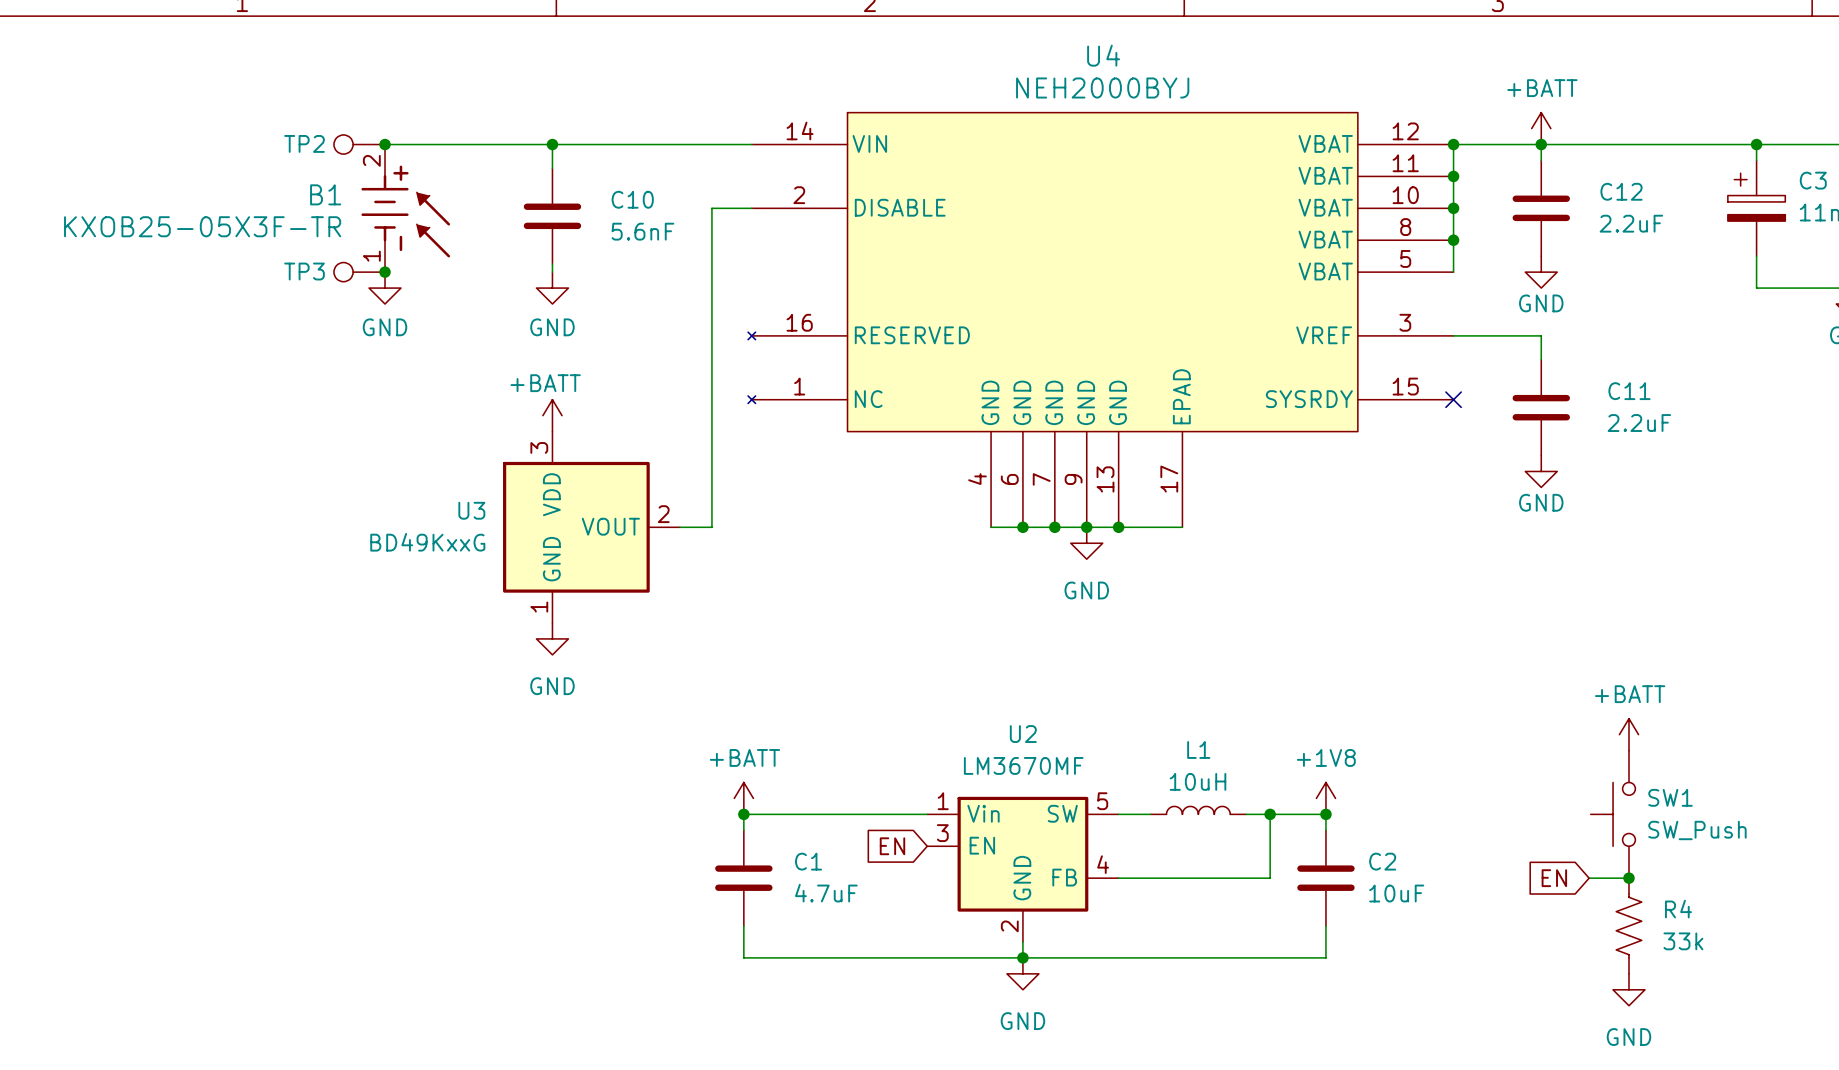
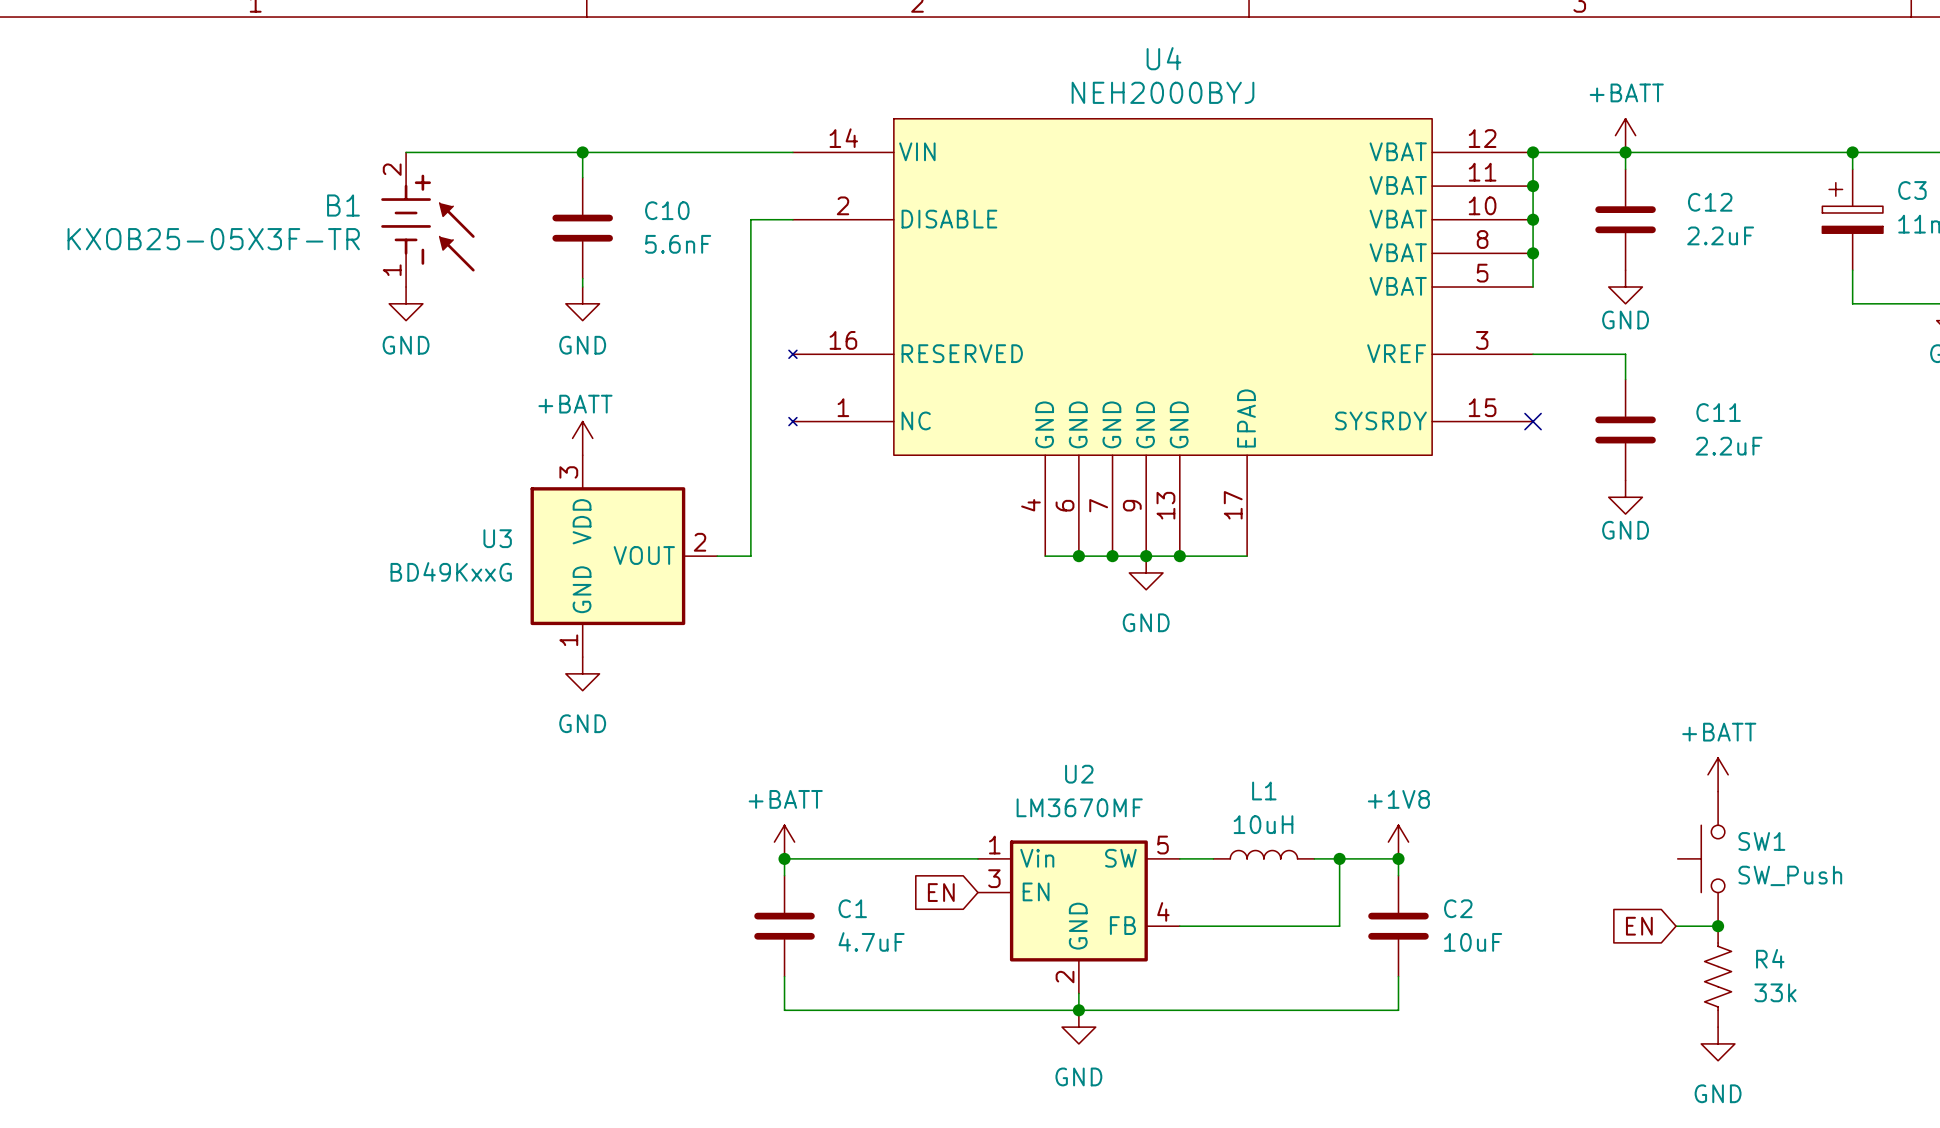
TP2: (359, 144) -> none
junction: (385, 144) -> none
TP3: (359, 272) -> none
junction: (385, 272) -> none

